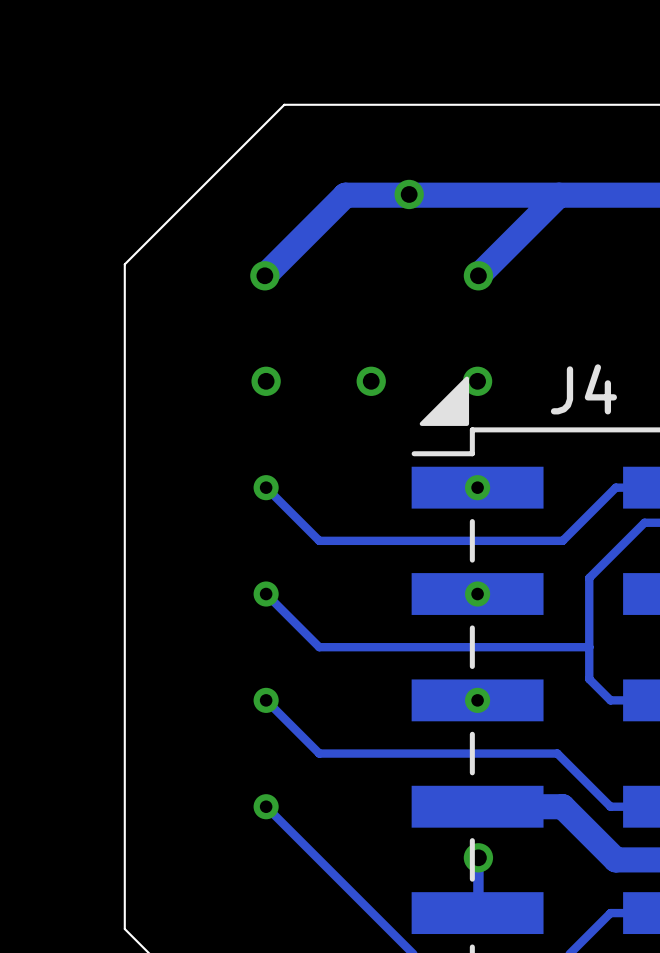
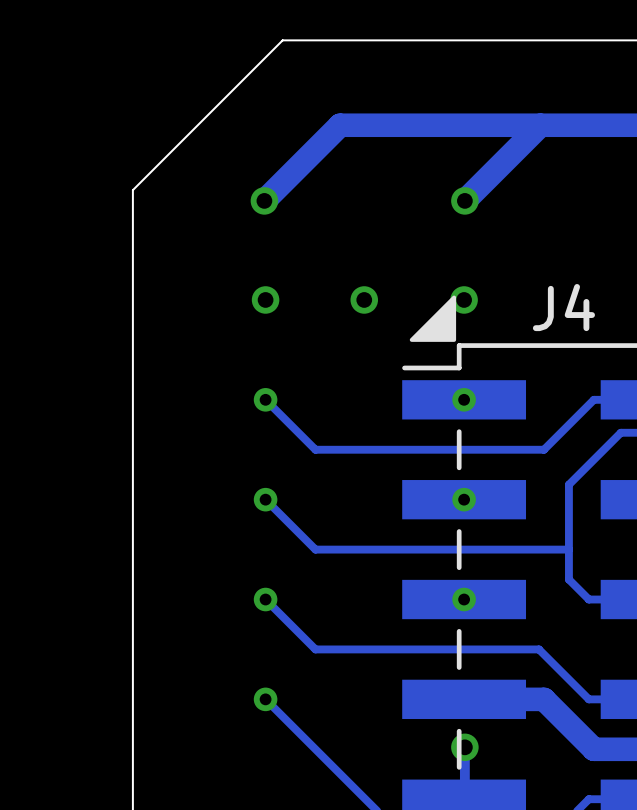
via: (409, 194) -> none

